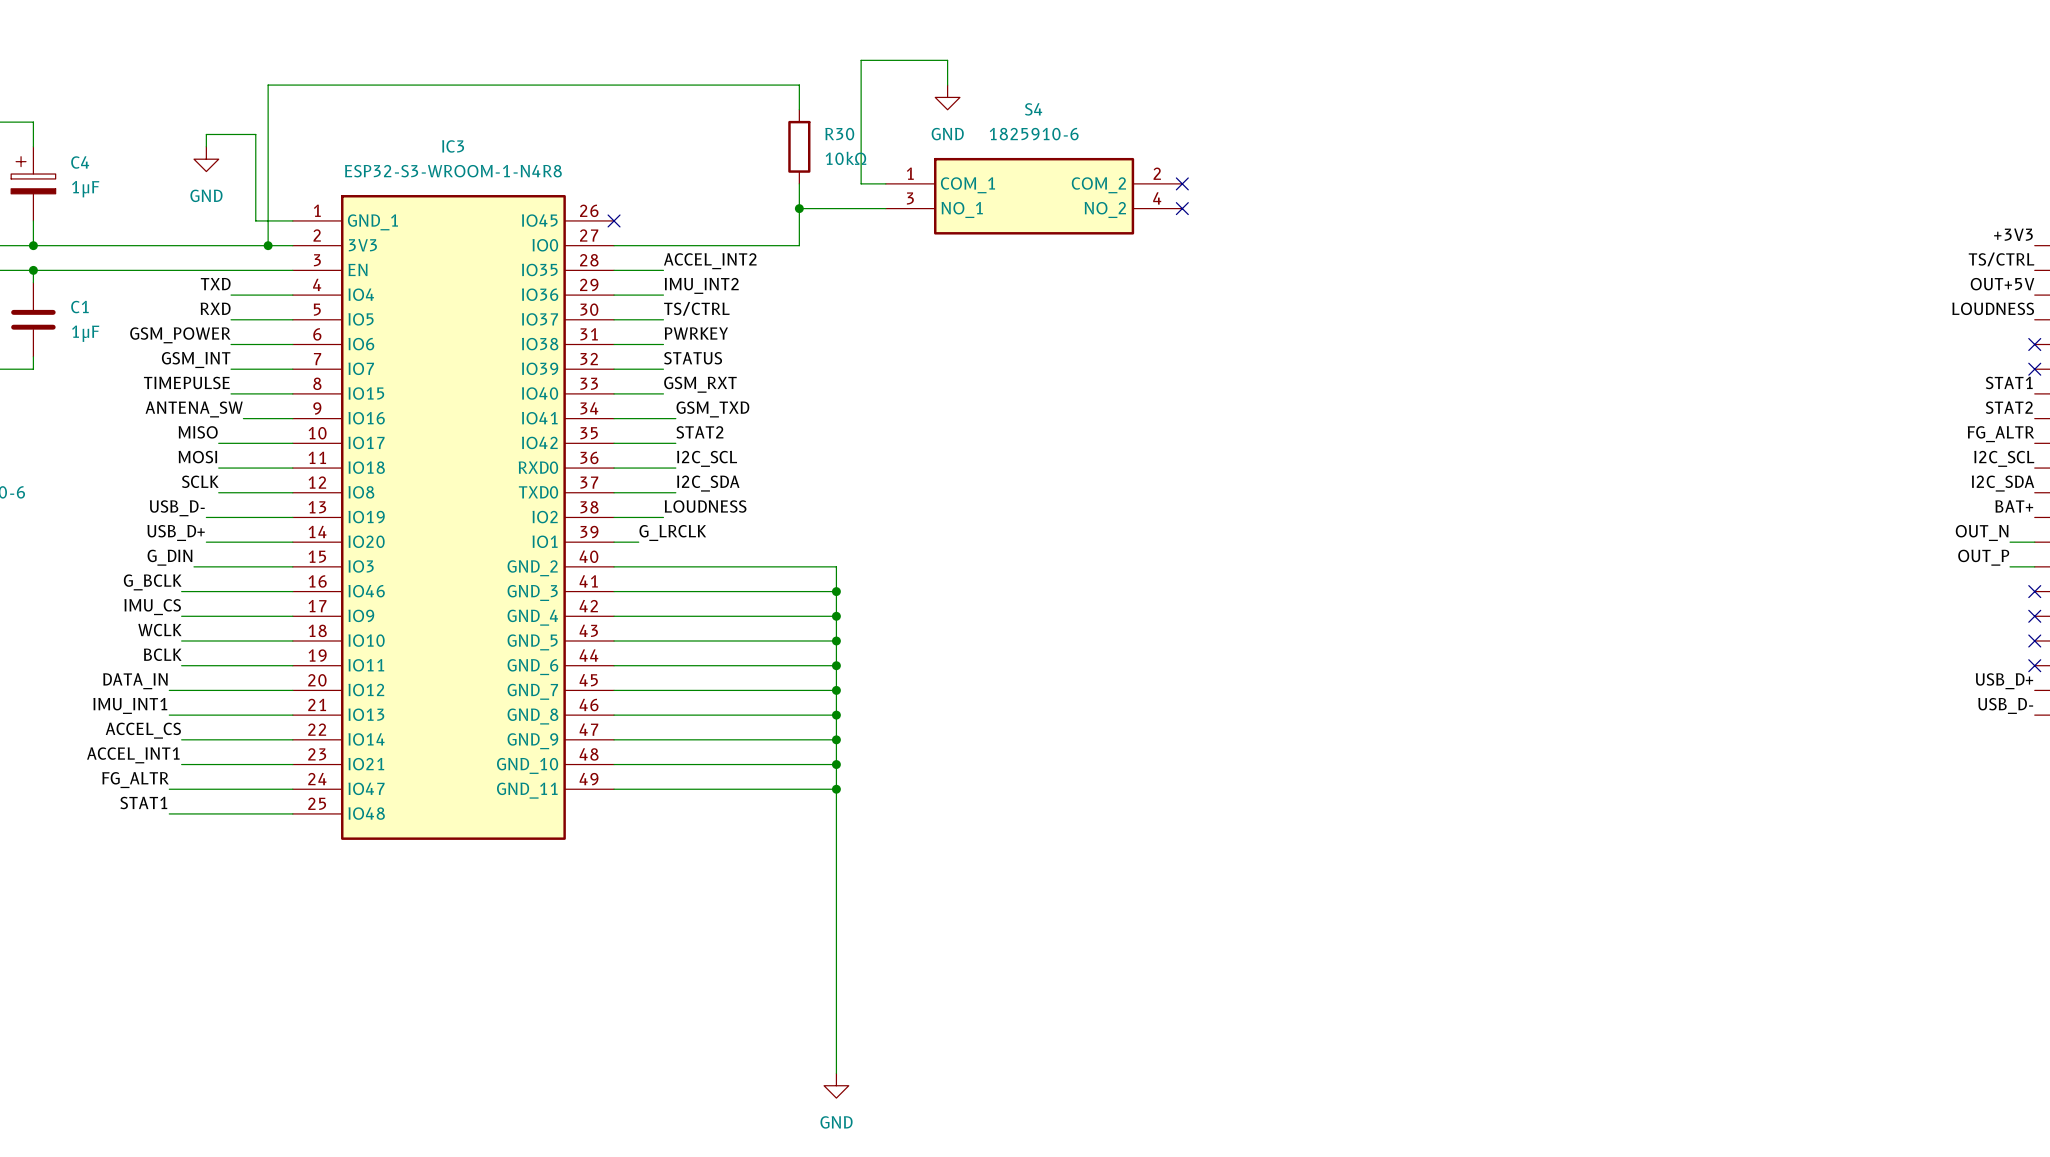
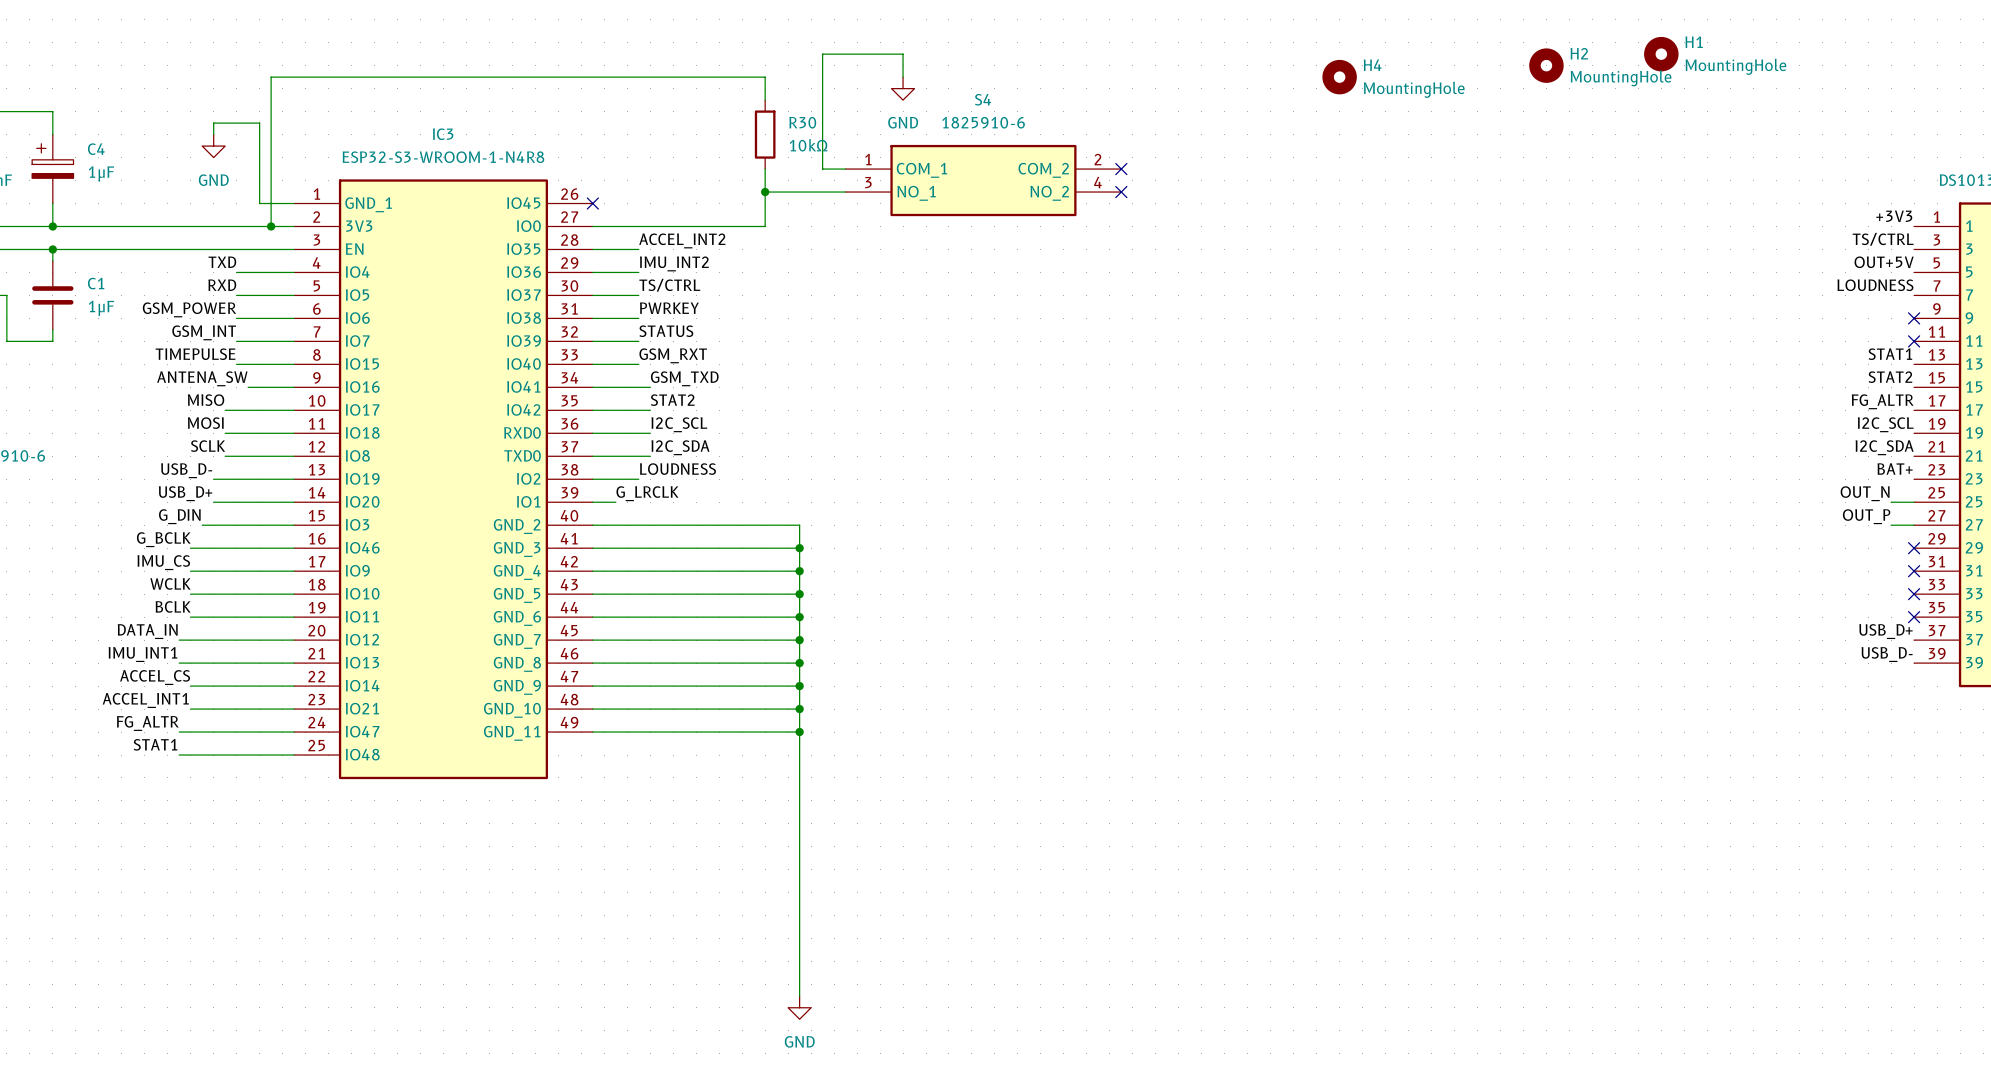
H1: none -> MountingHole (1661, 54)
H2: none -> MountingHole (1546, 65)
H4: none -> MountingHole (1339, 77)

